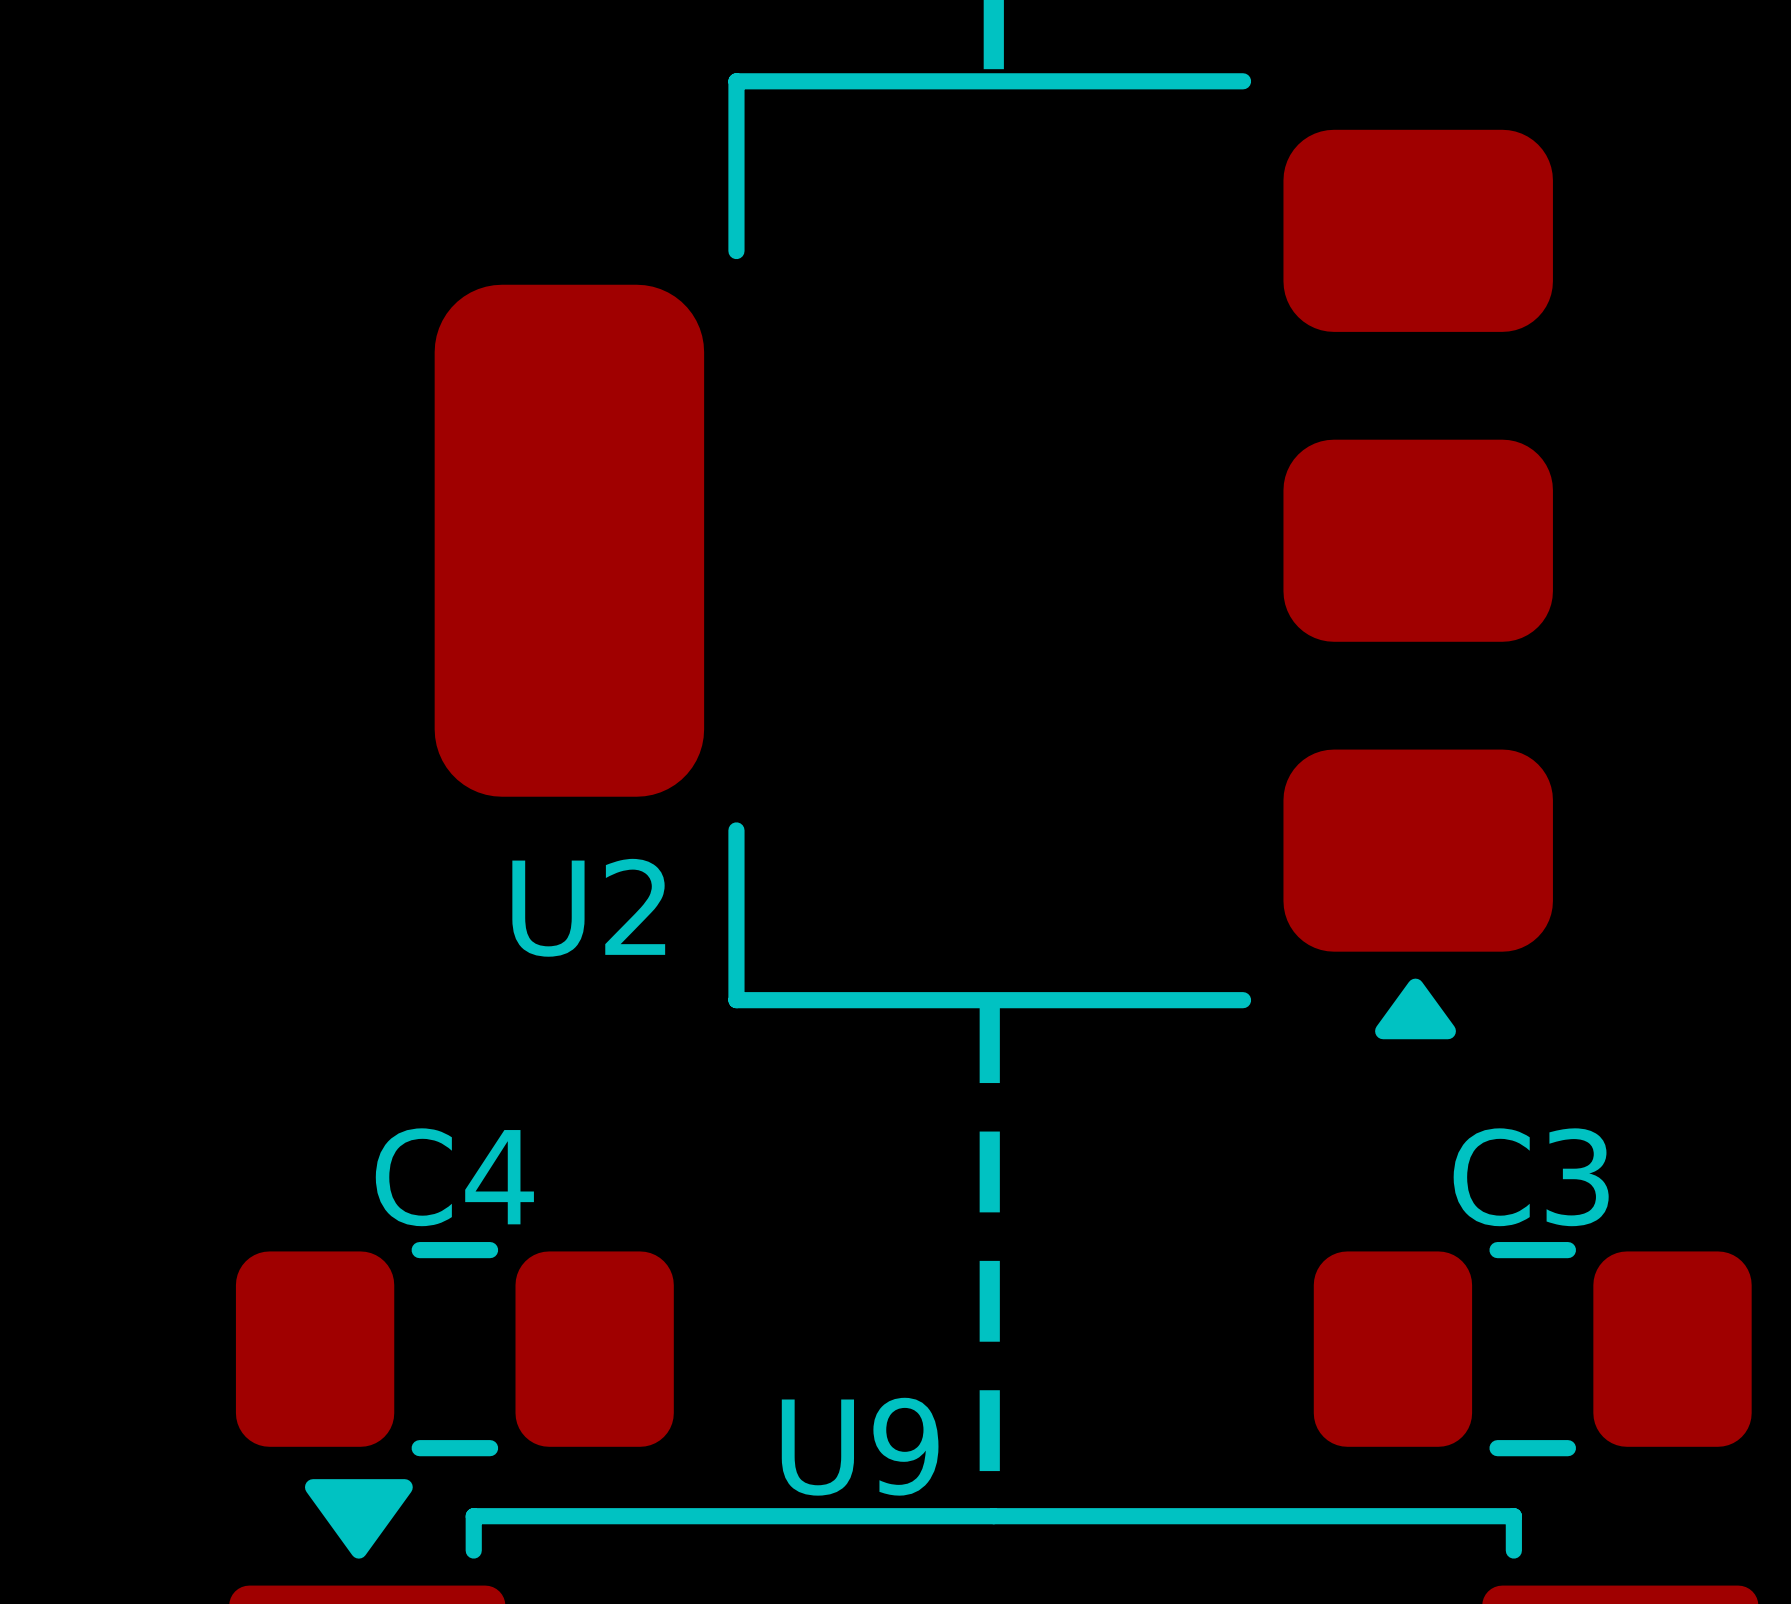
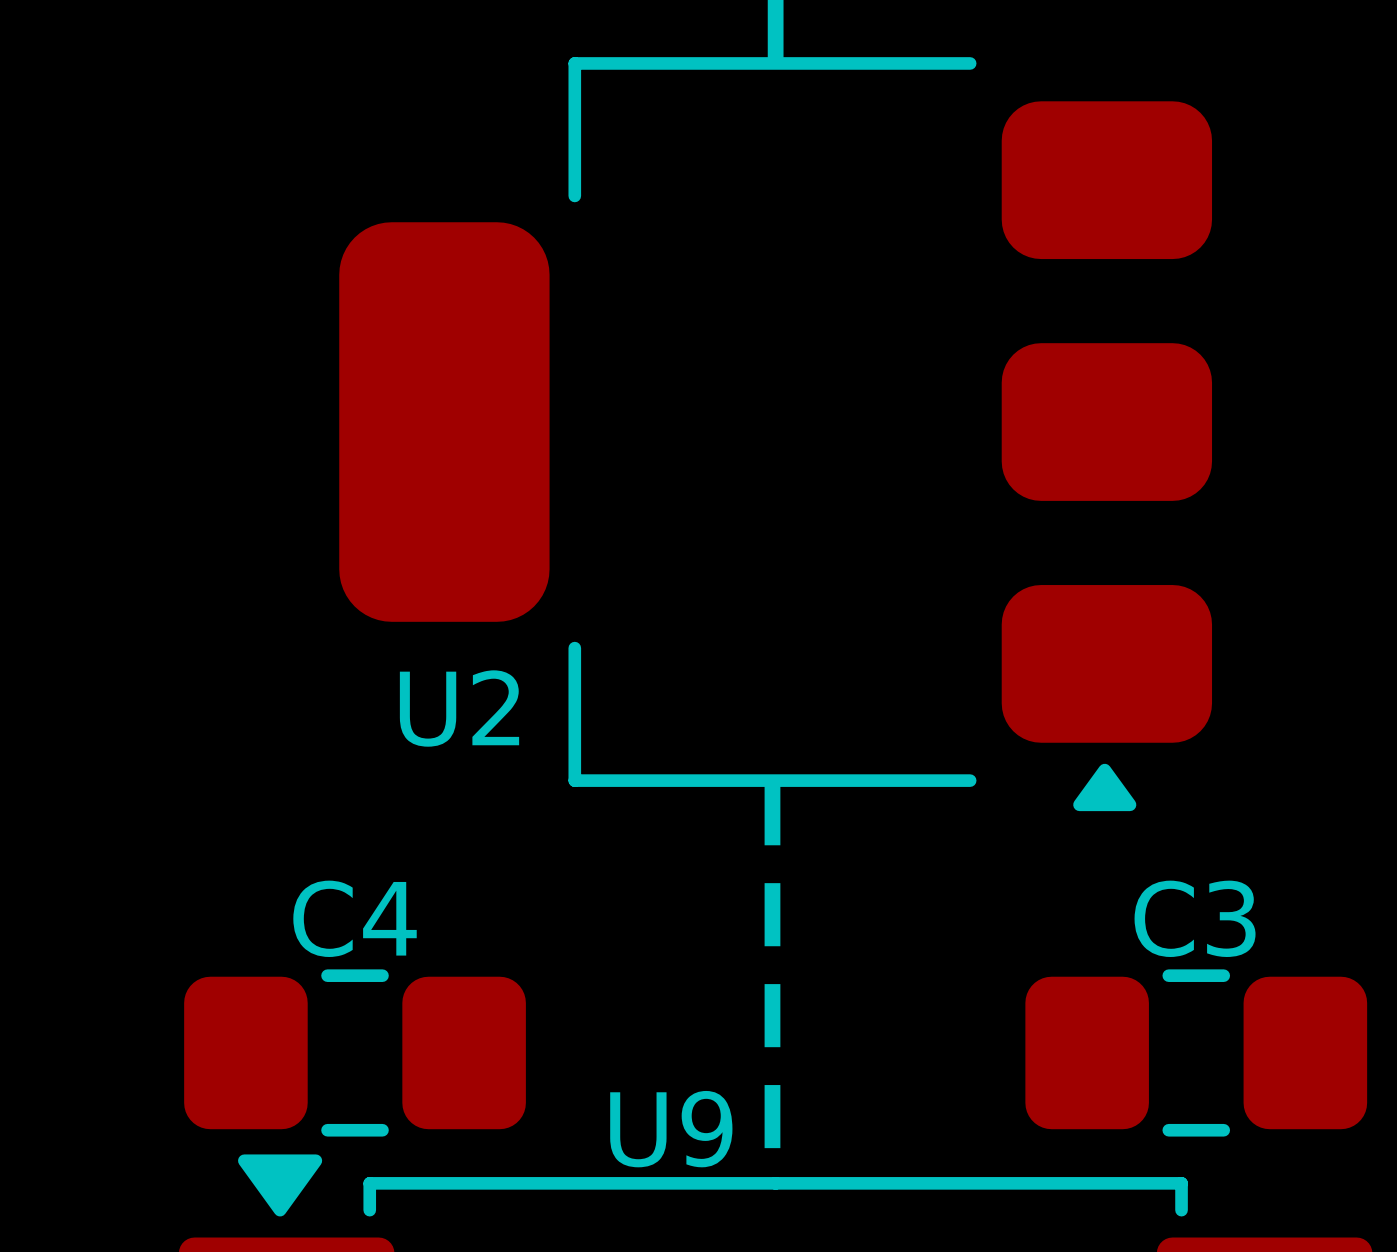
line: none -> (775, 53) (775, 59)

